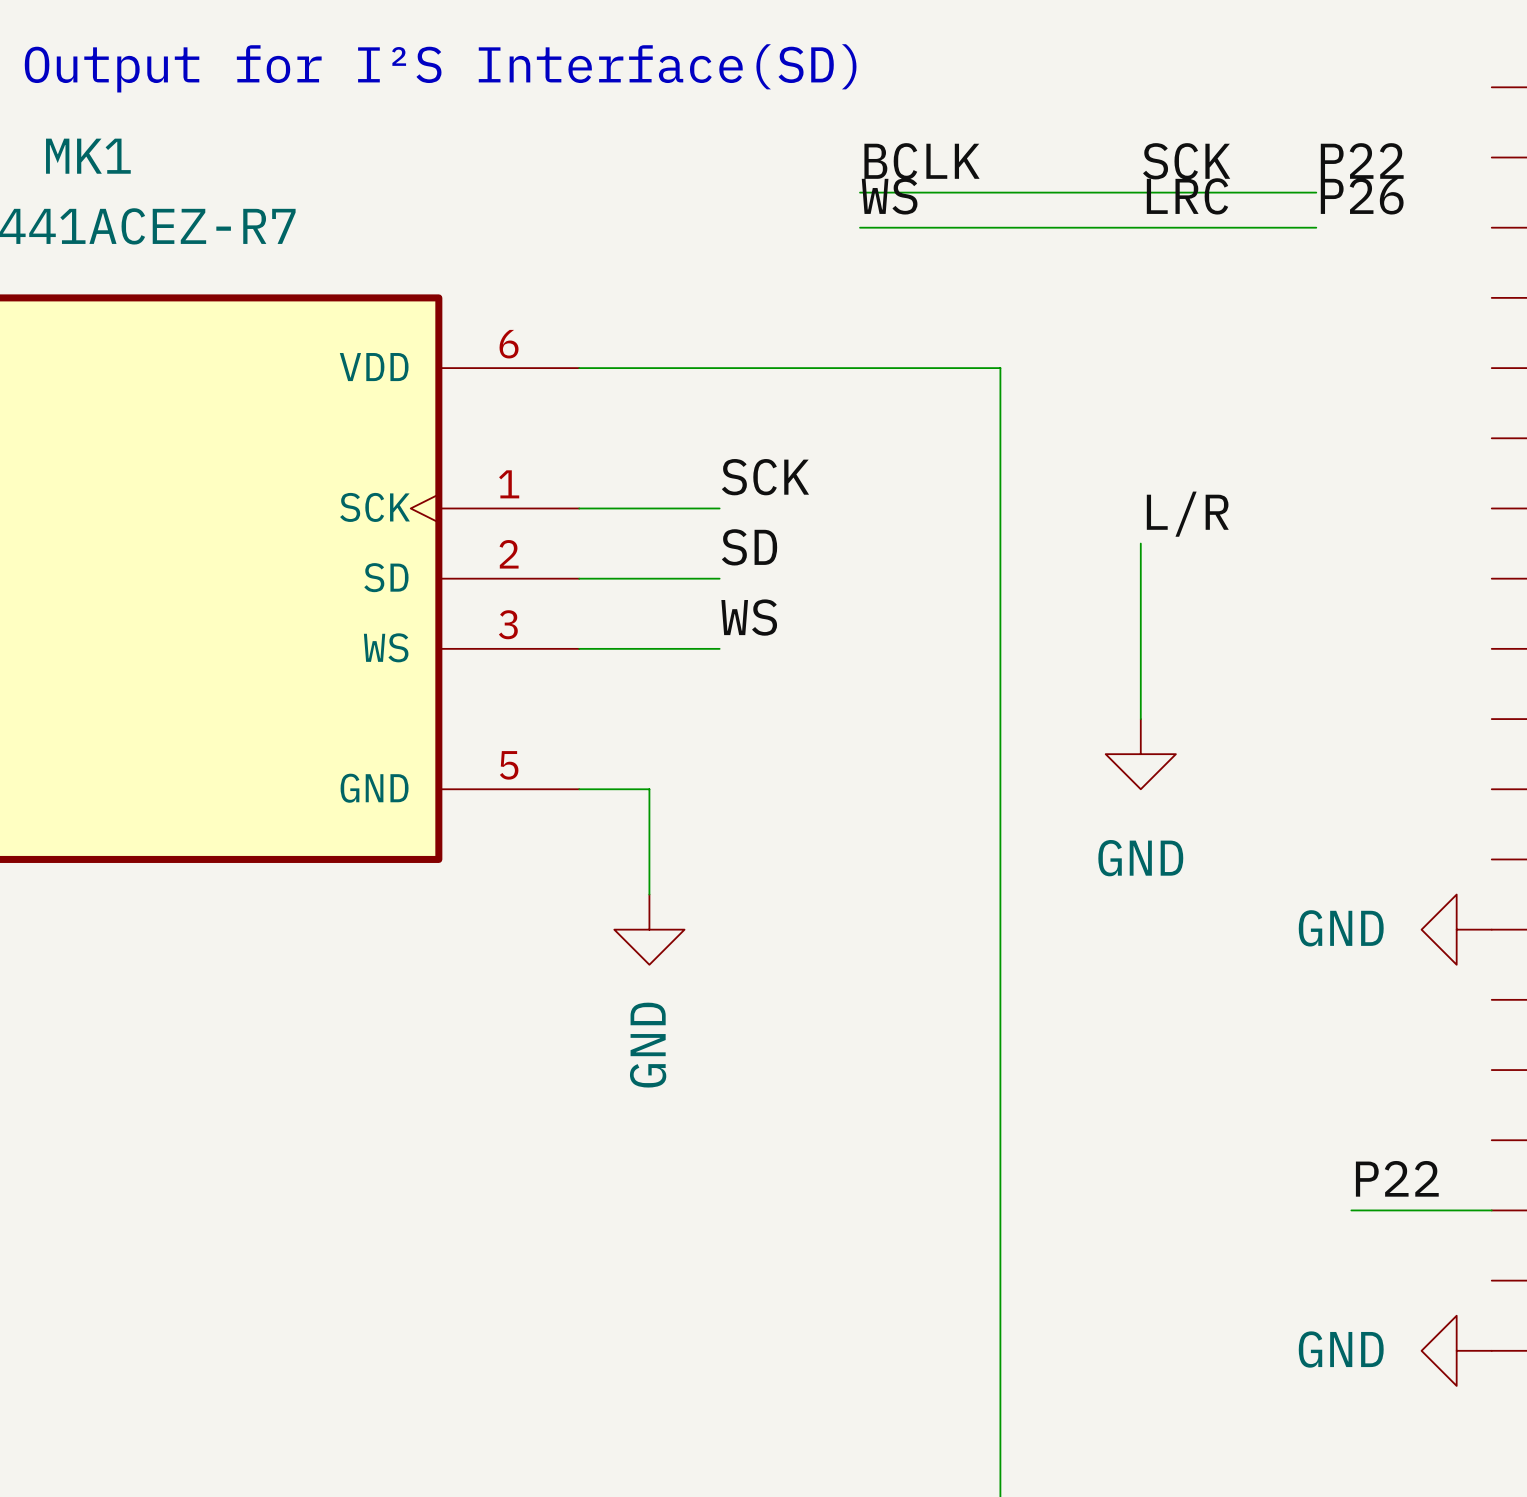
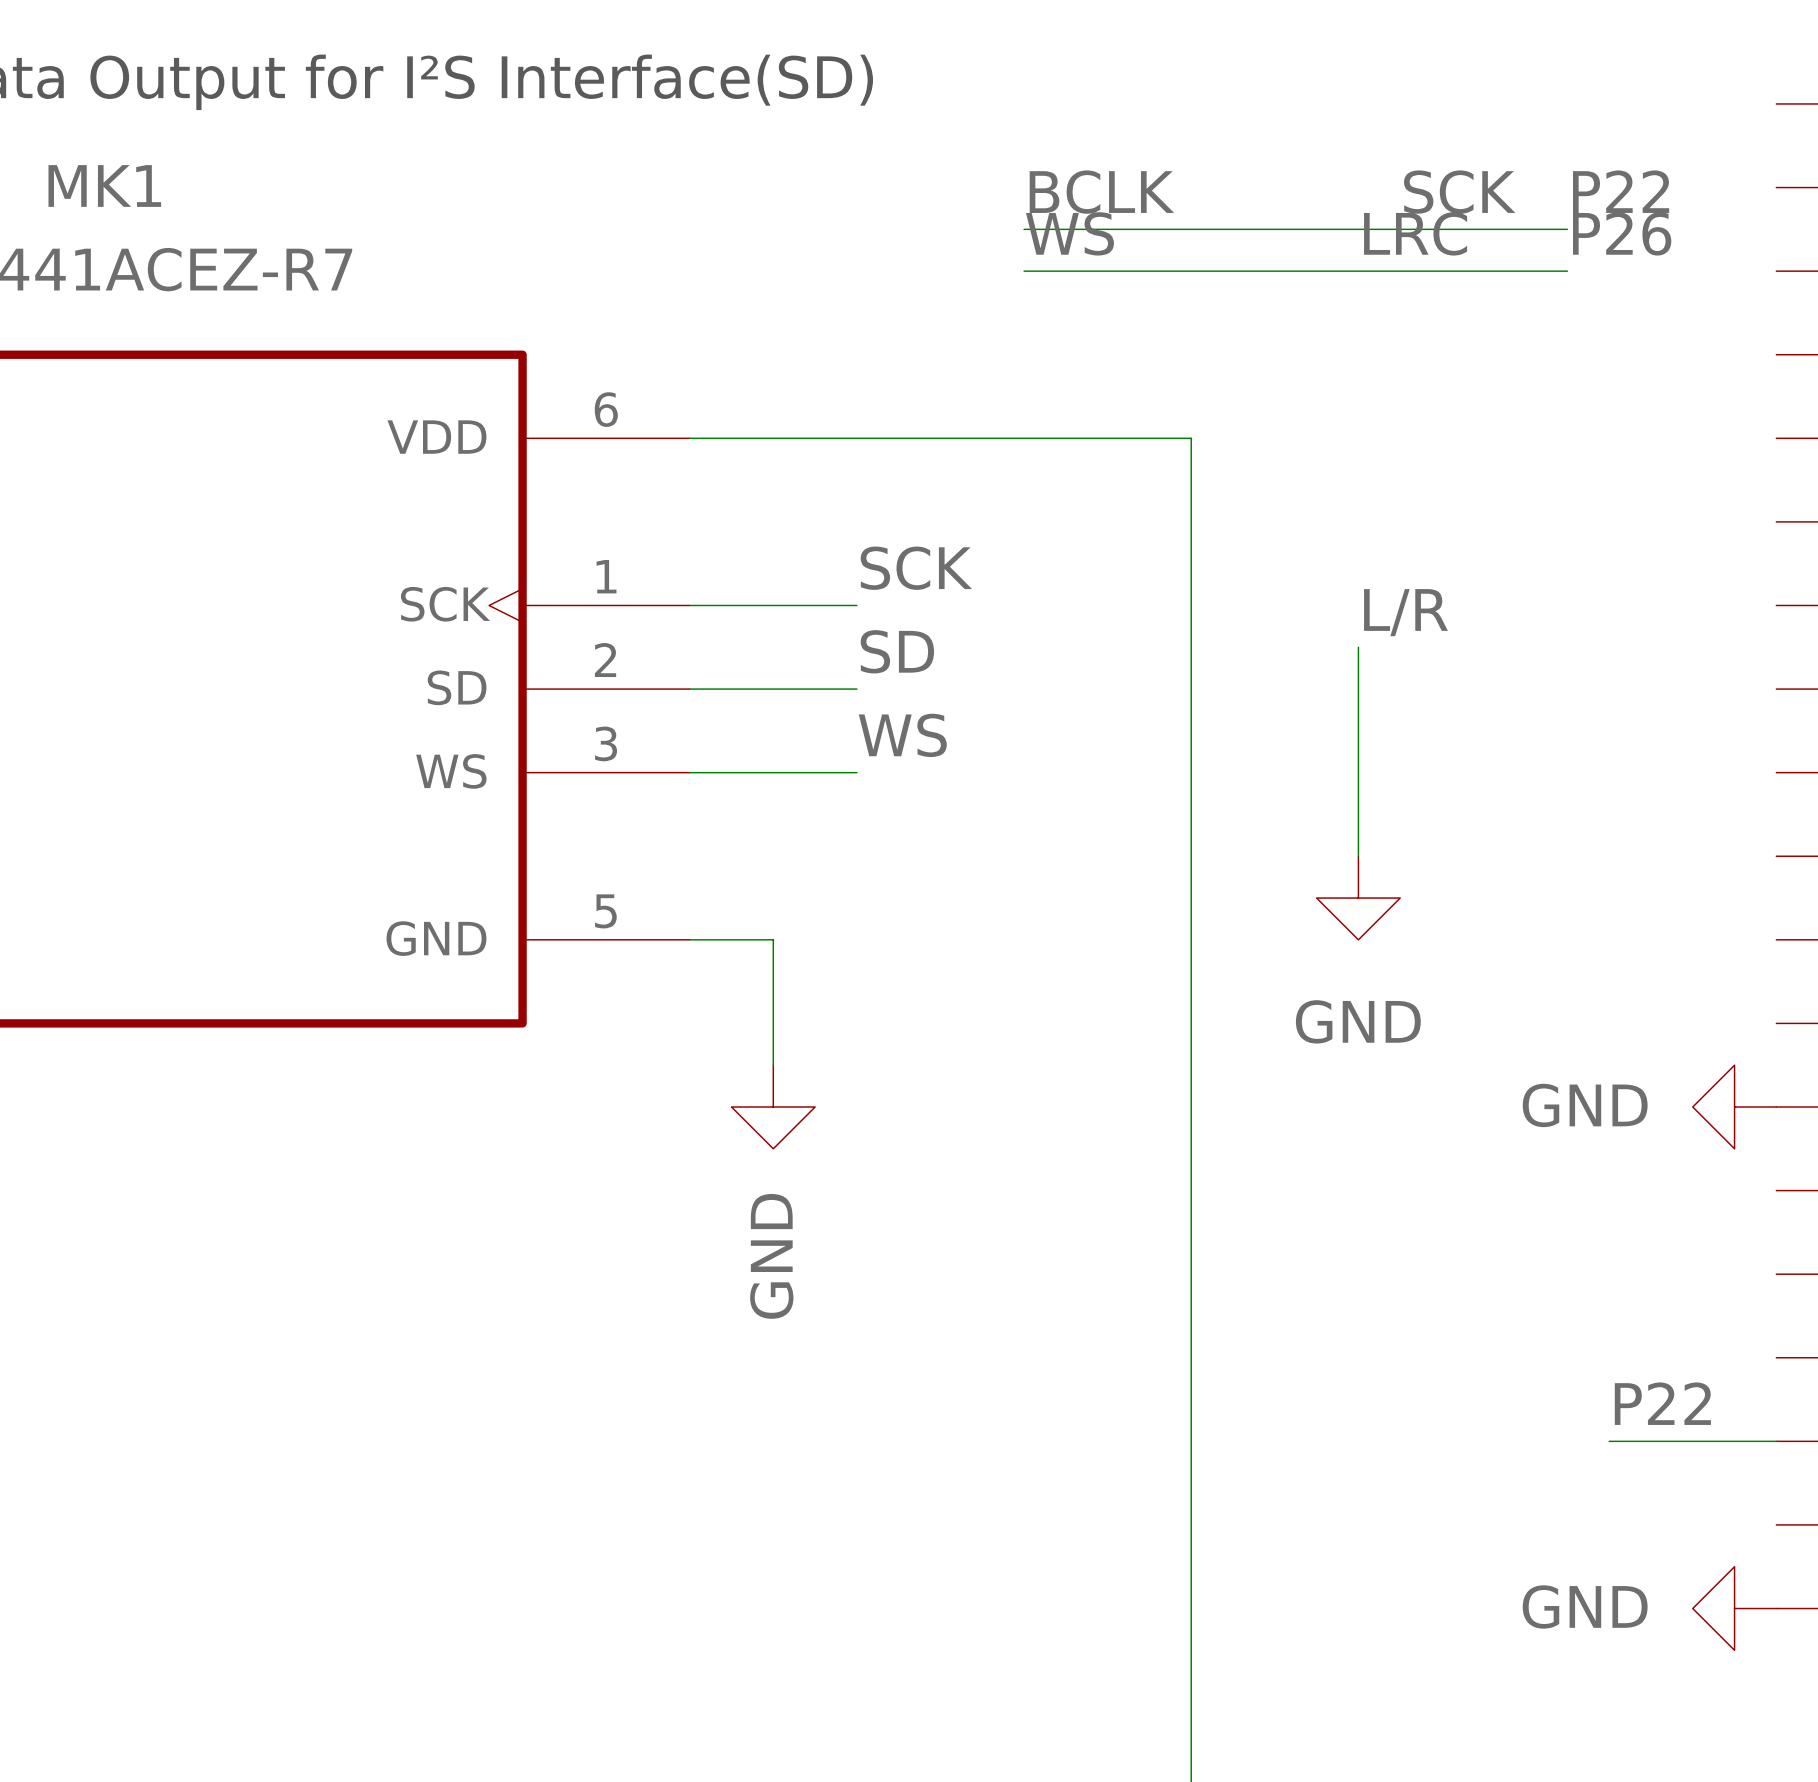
label position: SCK (1186, 161) -> SCK (1459, 192)

